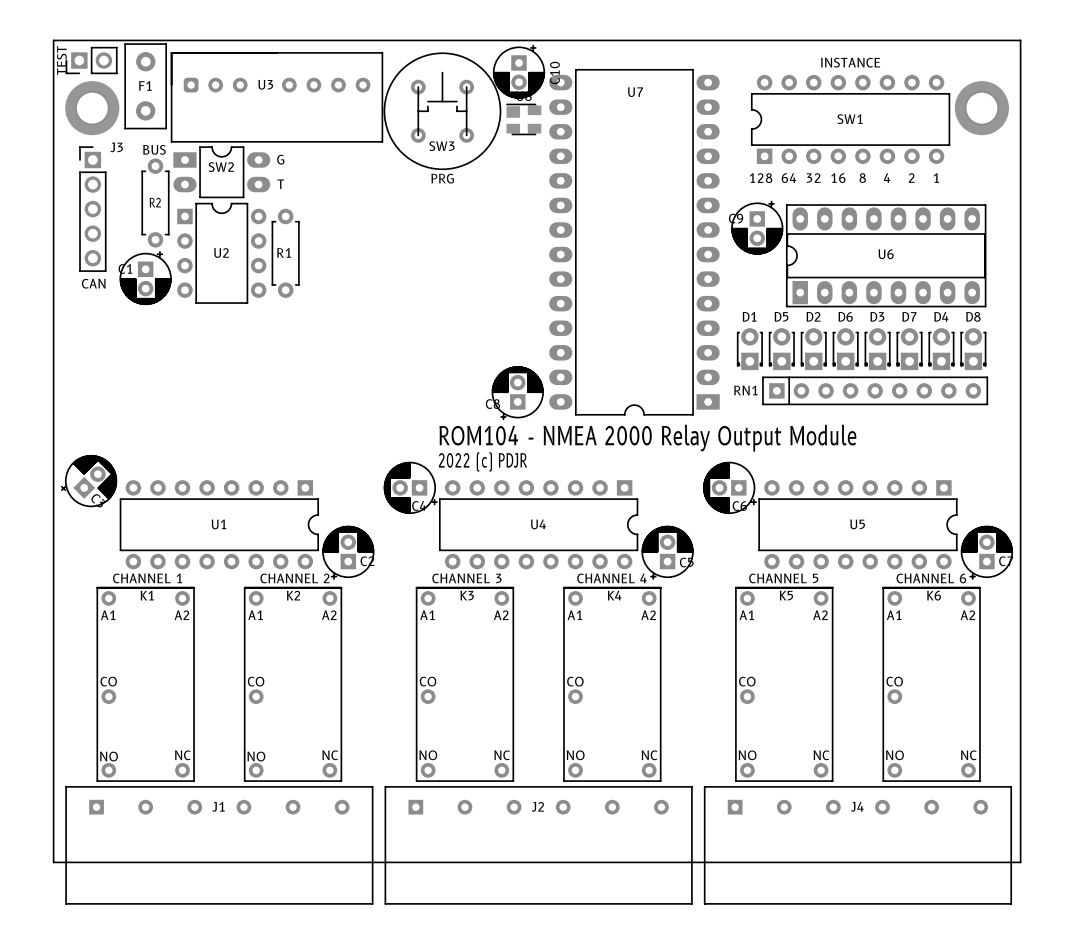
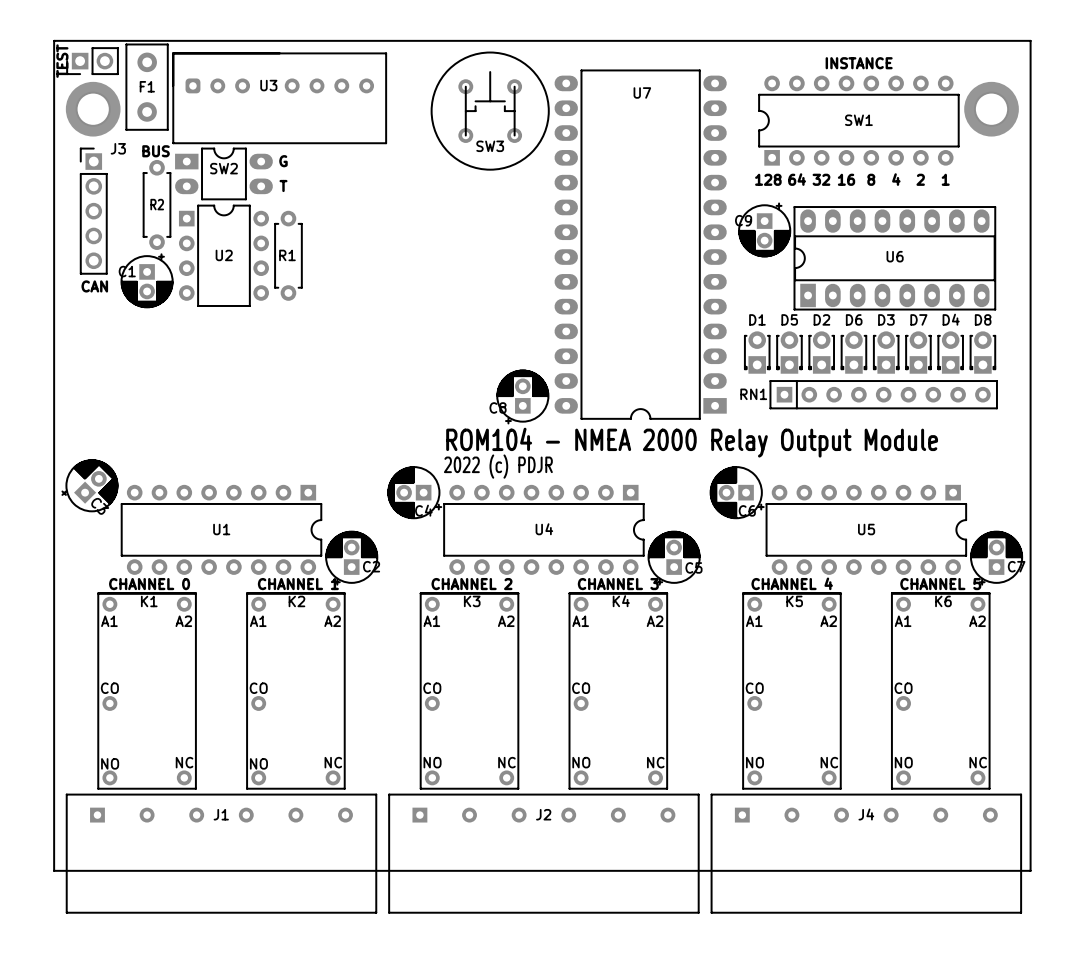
C10: (519, 71) -> none
SW3 position: (442, 111) -> (490, 111)
part: (523, 119) -> none
SW3 value: PRG (442, 178) -> none
text: CHANNEL 1 (147, 578) -> CHANNEL 0 (149, 584)
text: CHANNEL 2 (295, 578) -> CHANNEL 1 (298, 584)
text: CHANNEL 3 (466, 578) -> CHANNEL 2 (472, 584)
text: CHANNEL 4 (611, 578) -> CHANNEL 3 (618, 584)
text: CHANNEL 5 (783, 578) -> CHANNEL 4 (792, 583)
text: CHANNEL 6 (931, 578) -> CHANNEL 5 (940, 584)

